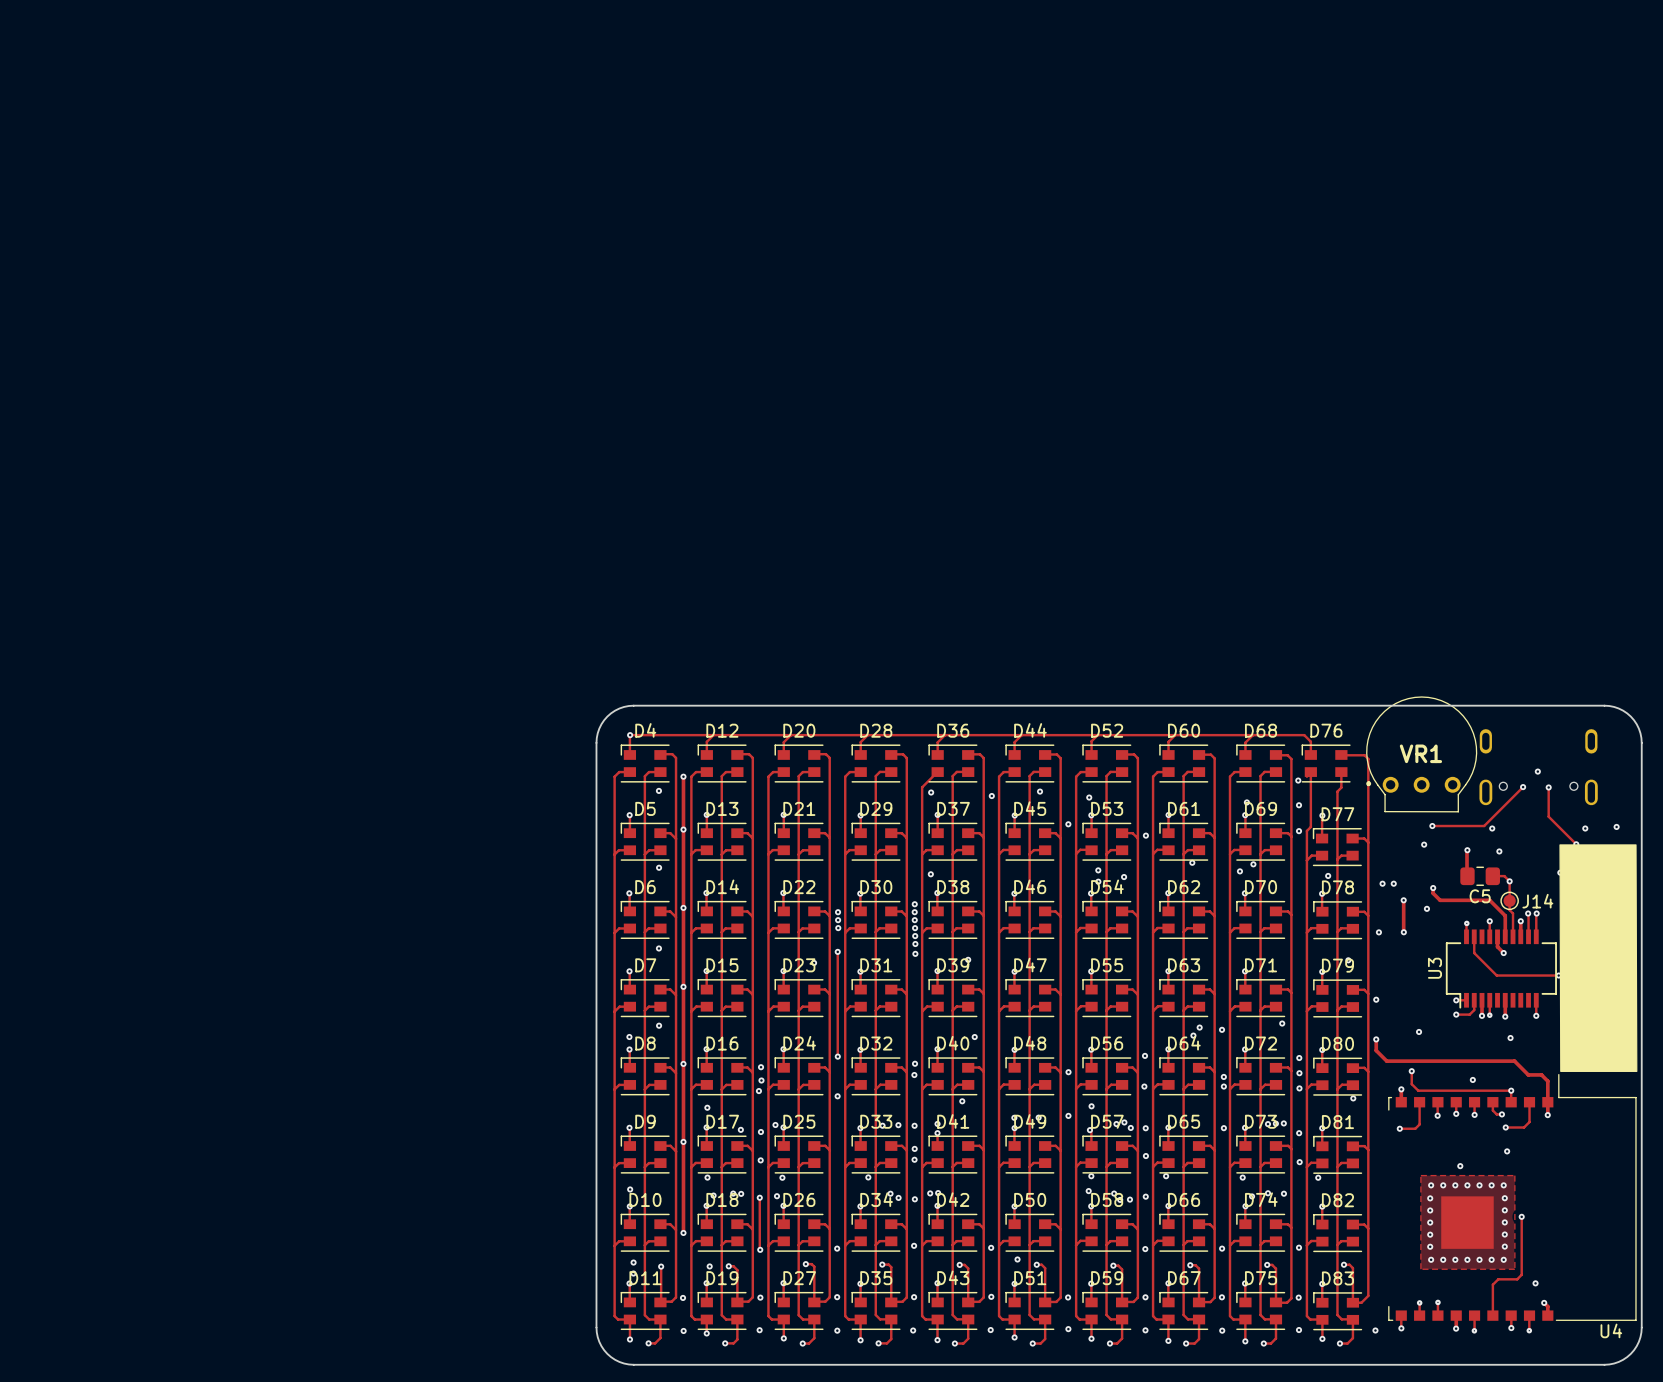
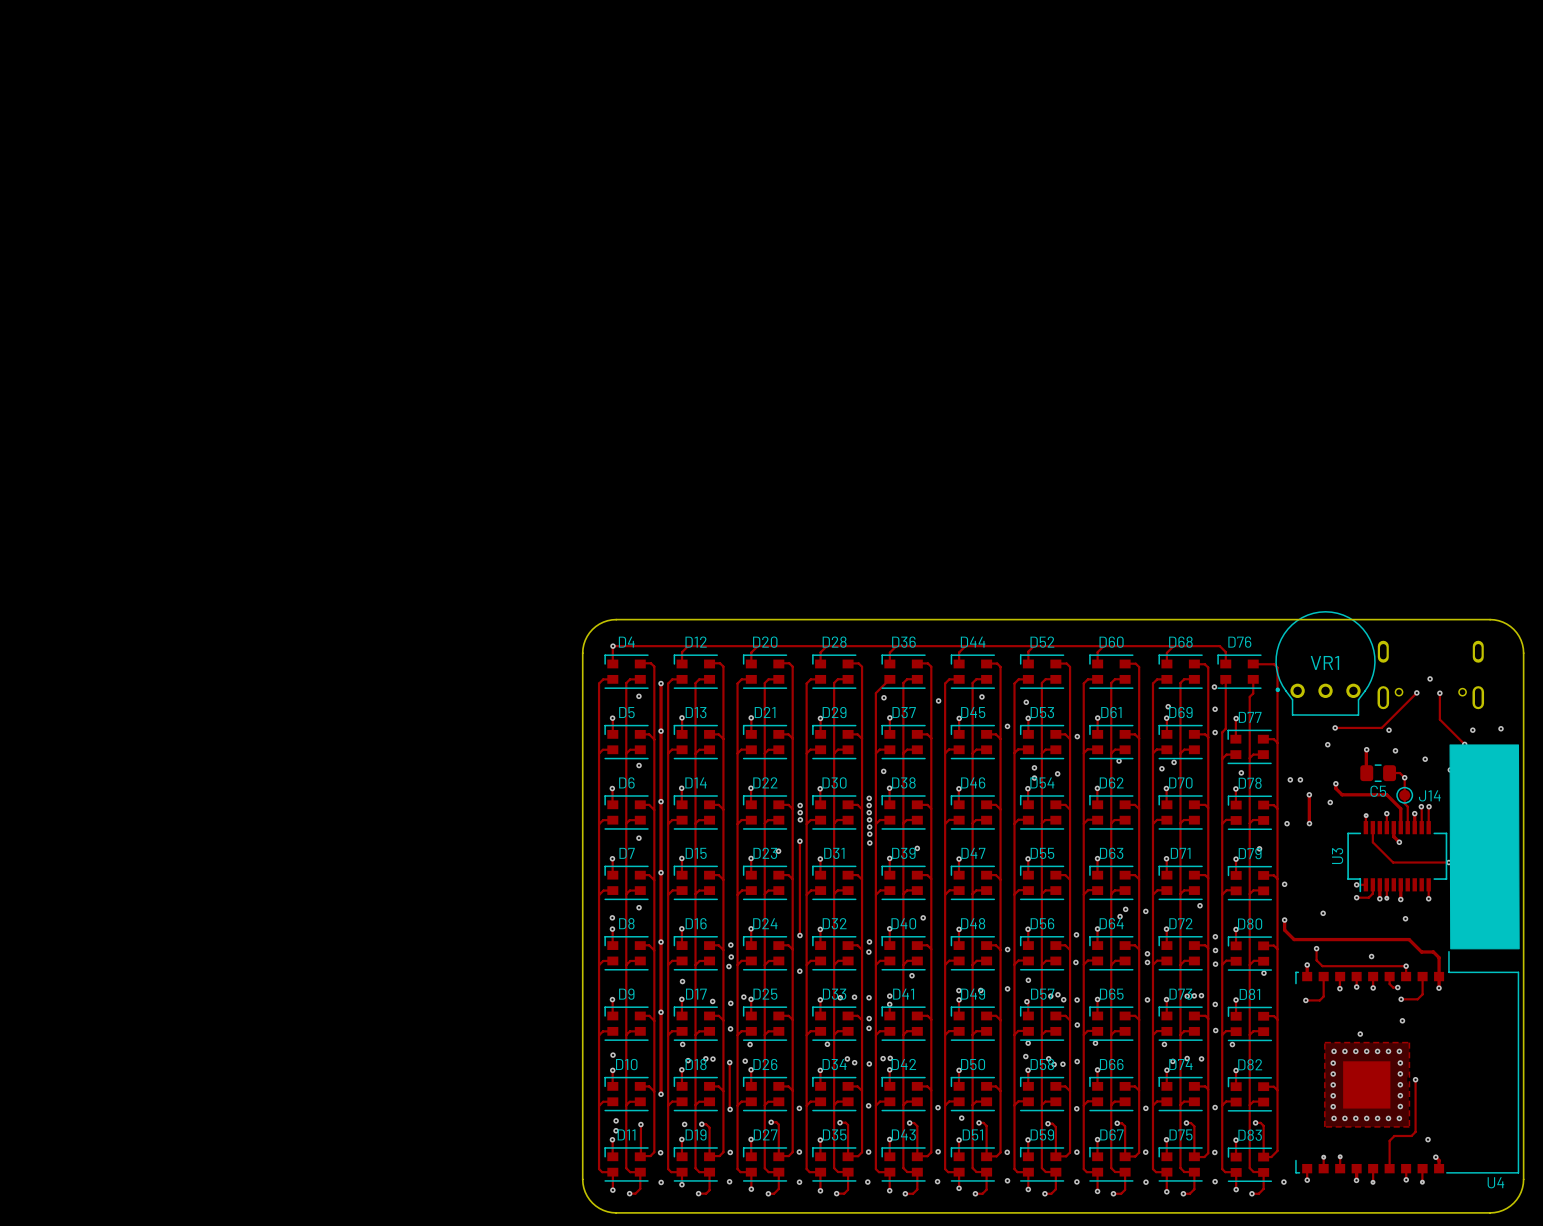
via: none -> (1425, 759)

